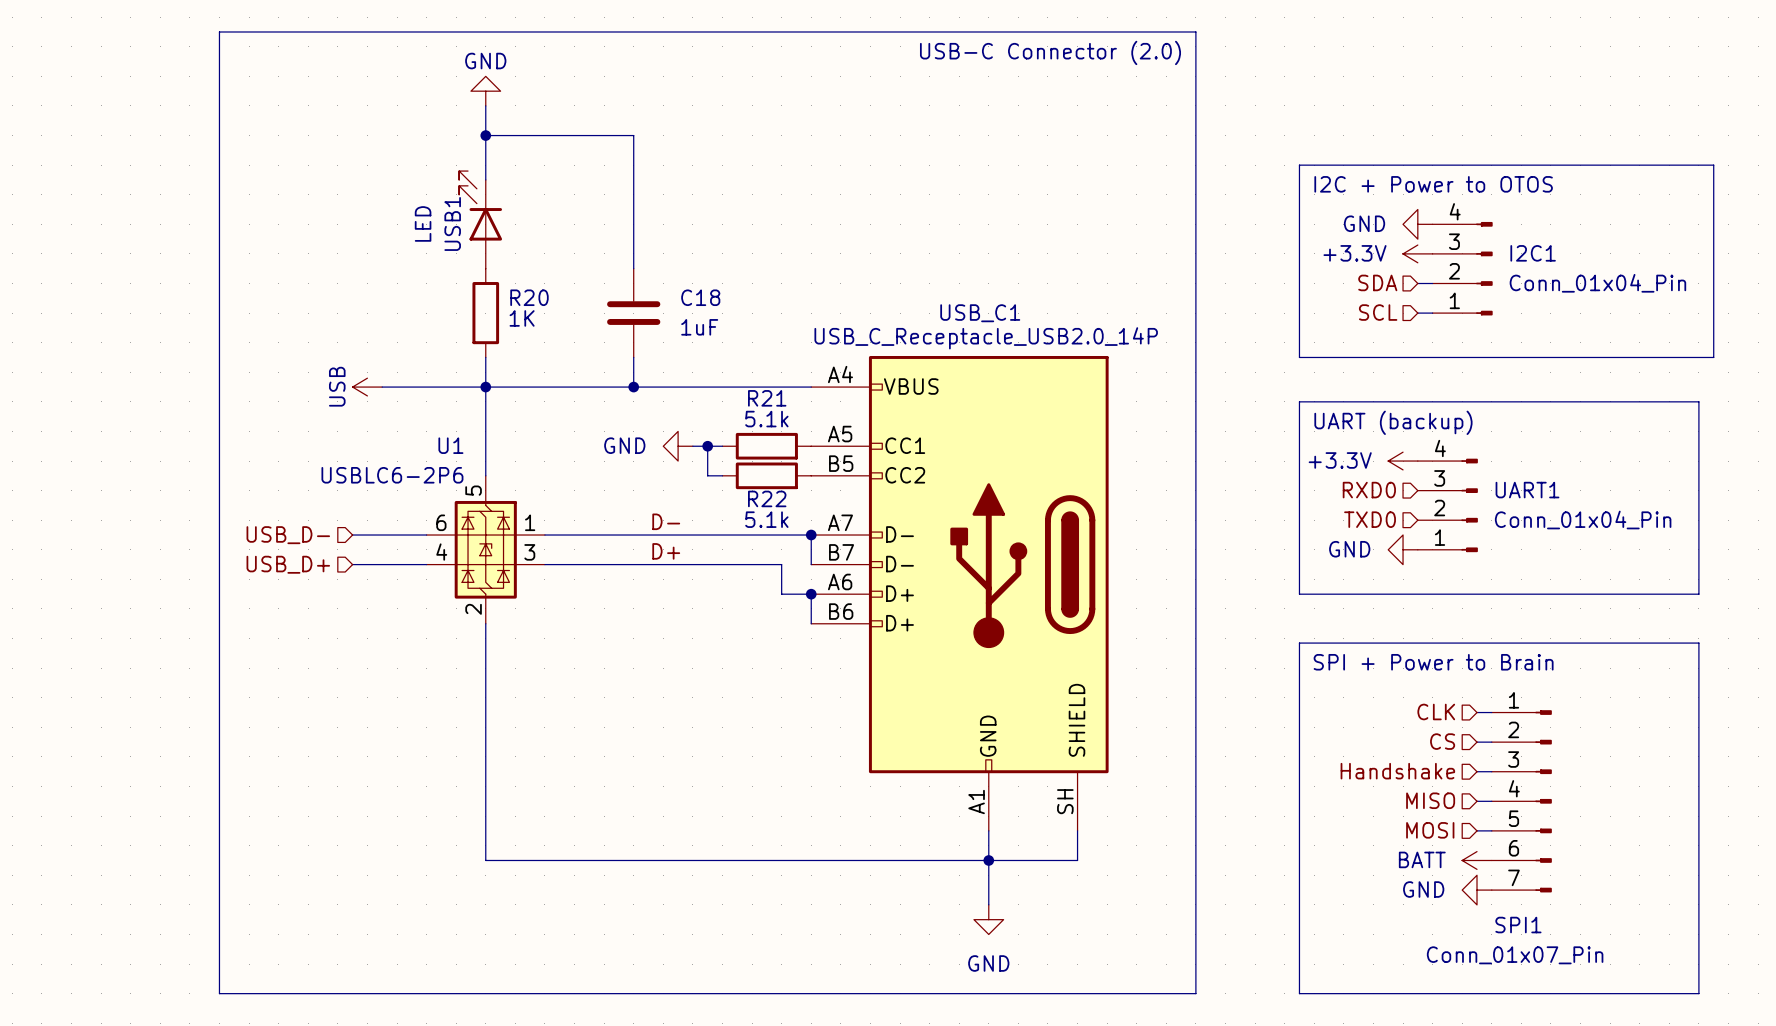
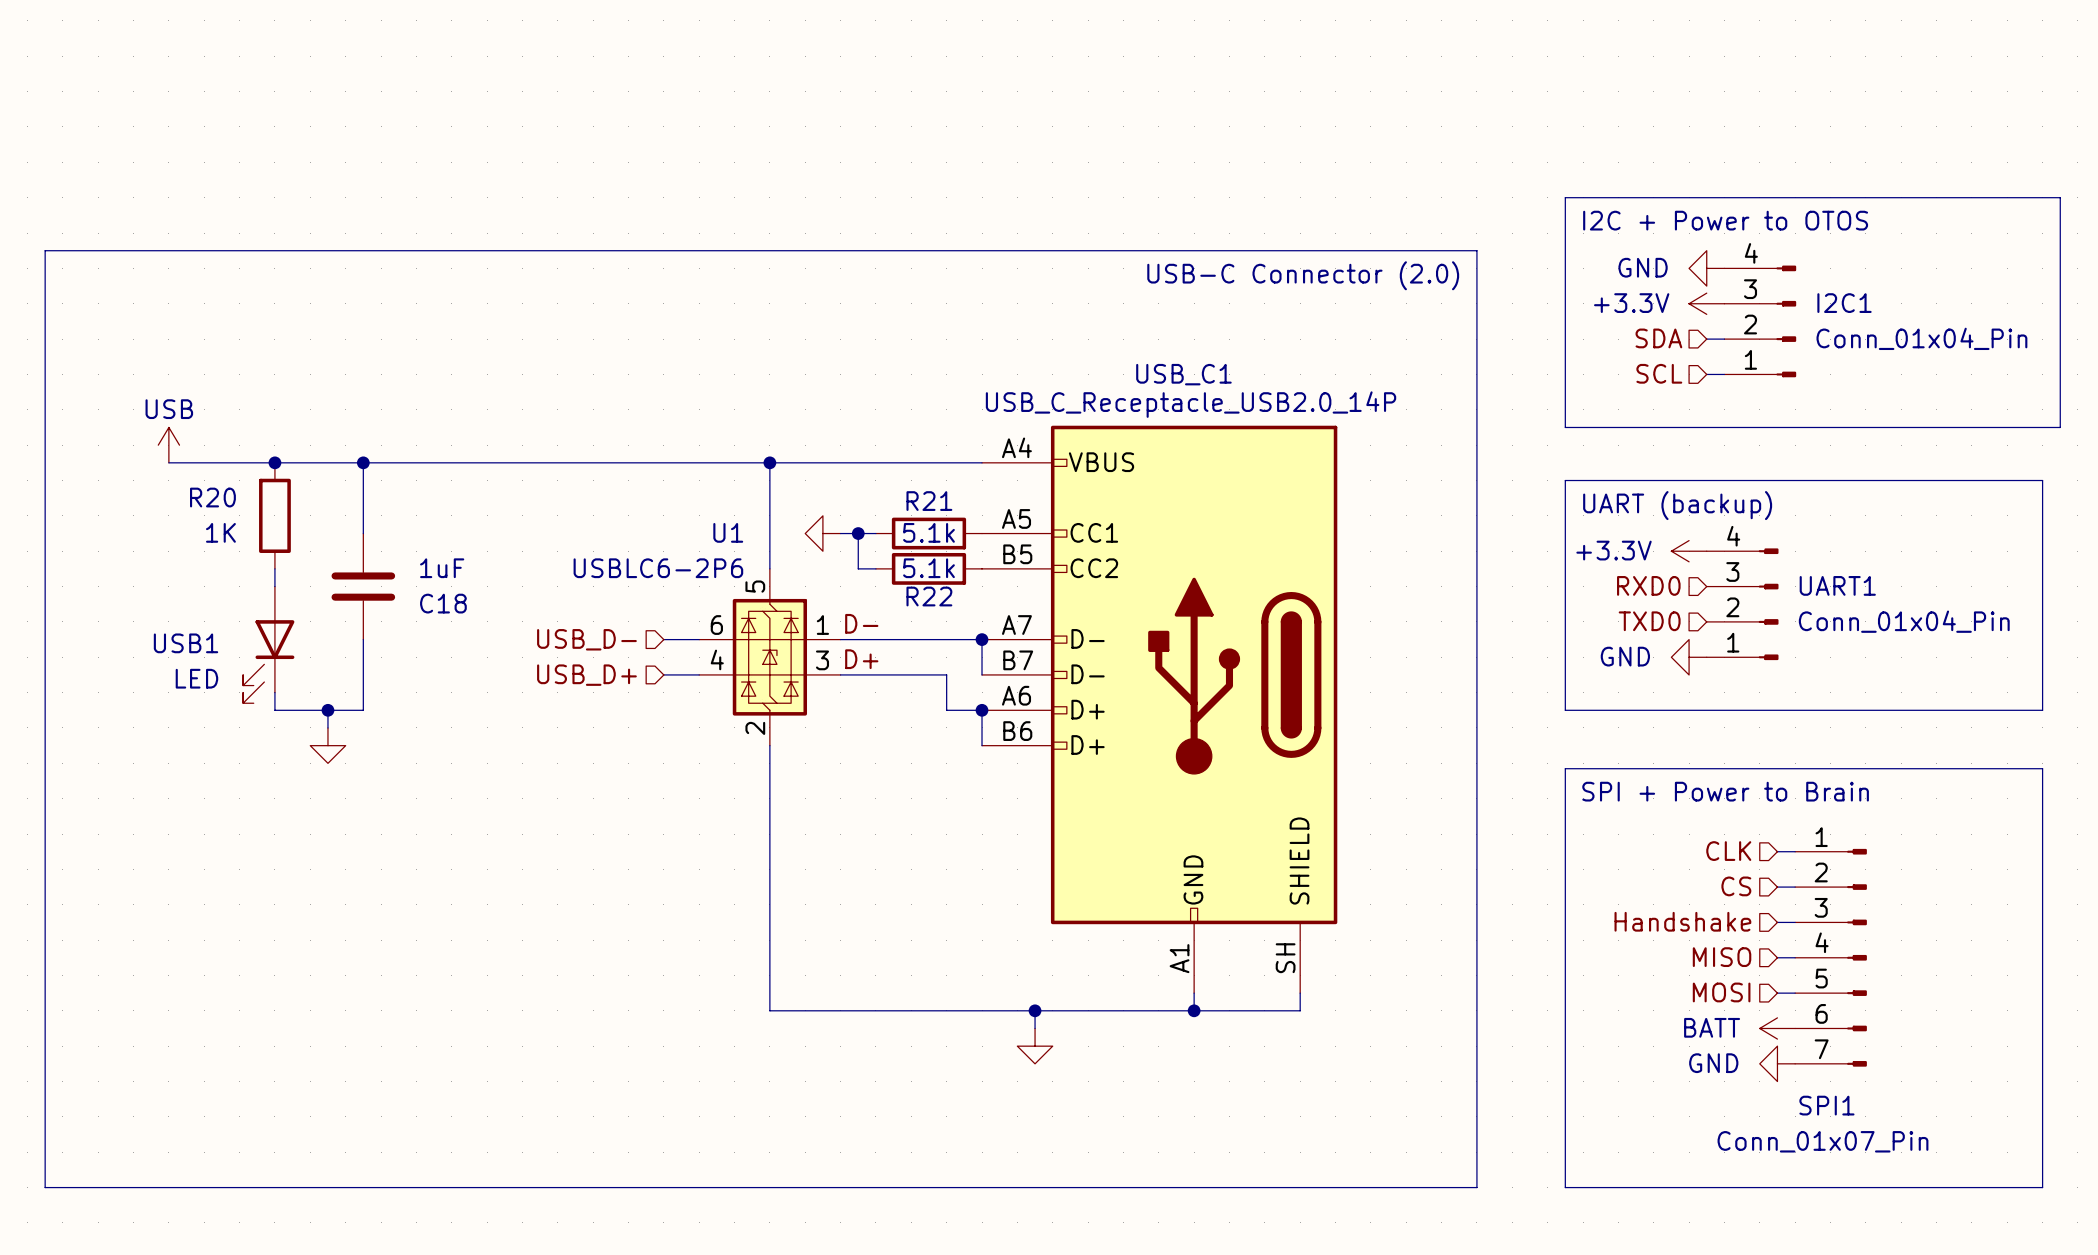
text position: USB-C Connector (2.0) (1050, 52) -> USB-C Connector (2.0) (1303, 275)
power symbol: GND (485, 91) -> none
wire: (485, 105) (485, 179) -> none
wire: (485, 135) (633, 135) (633, 268) -> none
junction: (485, 135) -> none
USB1 flip: as is (480, 205) -> up-down (268, 661)
USB1 position: (480, 219) -> (268, 644)
USB1 value position: LED (423, 223) -> LED (196, 678)
USB1 name position: USB1 (452, 223) -> USB1 (186, 643)
R20 name position: R20 (529, 297) -> R20 (212, 497)
C18 name position: C18 (700, 297) -> C18 (443, 603)
R20 position: (485, 313) -> (274, 515)
C18 position: (633, 313) -> (363, 586)
R20 value position: 1K (522, 318) -> 1K (220, 532)
C18 value position: 1uF (699, 327) -> 1uF (442, 568)
wire: (485, 357) (485, 475) -> none
wire: (633, 357) (633, 387) -> (769, 568) (769, 462)
wire: none -> (168, 462) (469, 462)
junction: none -> (274, 462)
wire: none -> (363, 462) (363, 533)
junction: none -> (363, 462)
power symbol rotation: 0° (367, 387) -> 90° clockwise (168, 445)
power symbol position: USB (367, 387) -> USB (168, 445)
junction: (485, 387) -> none
R21 name position: R21 (767, 398) -> R21 (929, 501)
R21 value position: 5.1k (766, 419) -> 5.1k (928, 532)
power symbol text: GND (624, 445) -> none
R22 value position: 5.1k (766, 519) -> 5.1k (928, 568)
label position: D- (666, 521) -> D- (861, 623)
hierarchical label position: USB_D- (288, 535) -> USB_D- (586, 639)
wire: none -> (363, 639) (363, 710) (274, 710) (274, 692)
wire: (352, 535) (426, 535) -> none
U1 position: (485, 549) -> (769, 657)
label position: D+ (666, 551) -> D+ (861, 659)
hierarchical label position: USB_D+ (288, 564) -> USB_D+ (586, 675)
wire: (352, 564) (426, 564) -> none
wire: none -> (327, 710) (327, 727)
junction: none -> (327, 710)
power symbol: none -> (327, 745)
wire: (485, 623) (485, 860) (1077, 860) (1077, 845) -> (769, 745) (769, 1010) (1300, 1010)
wire: none -> (1035, 1010) (1035, 1028)
junction: none -> (1035, 1010)
wire: (988, 845) (988, 904) -> none
junction position: (988, 860) -> (1194, 1010)
power symbol: none -> (1035, 1046)
power symbol: GND (988, 919) -> none
line: (219, 993) (219, 31) (1195, 31) (1195, 993) -> (274, 1187) (45, 1187) (45, 250) (1476, 250) (1476, 1187) (1441, 1187)

